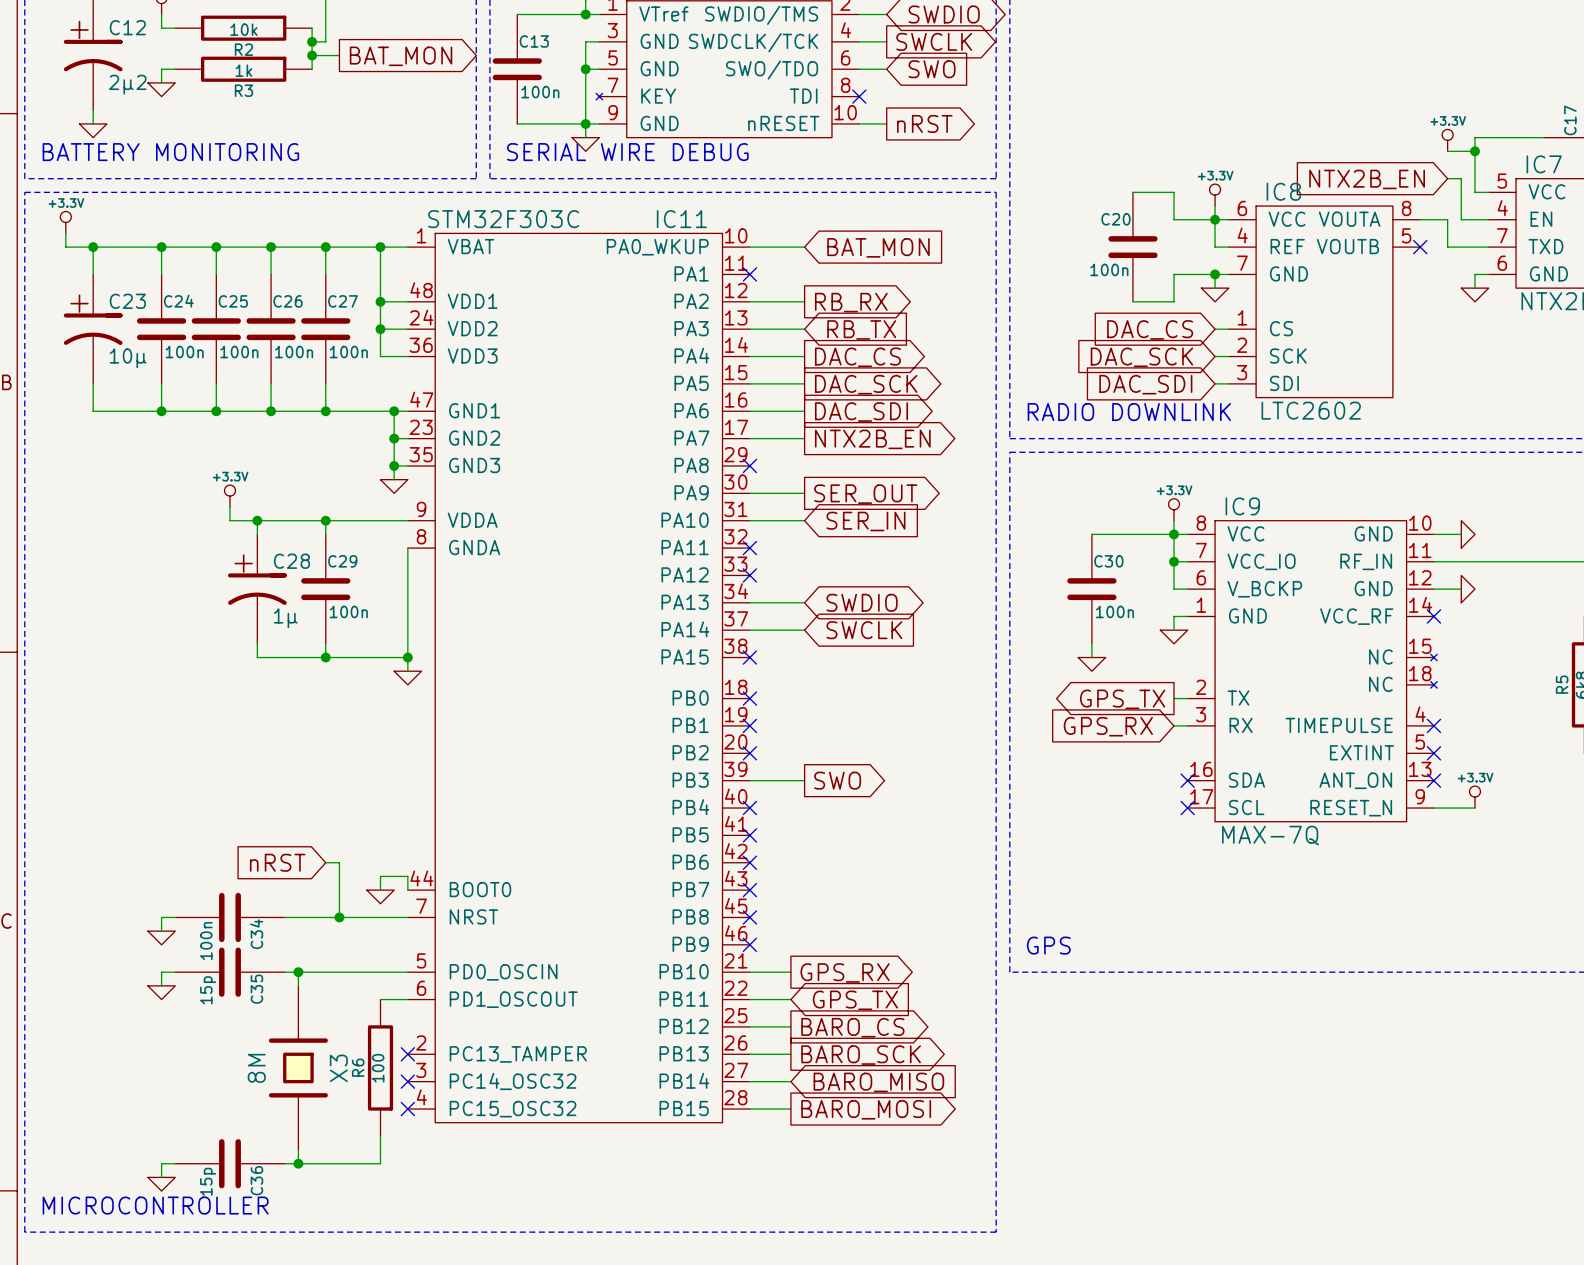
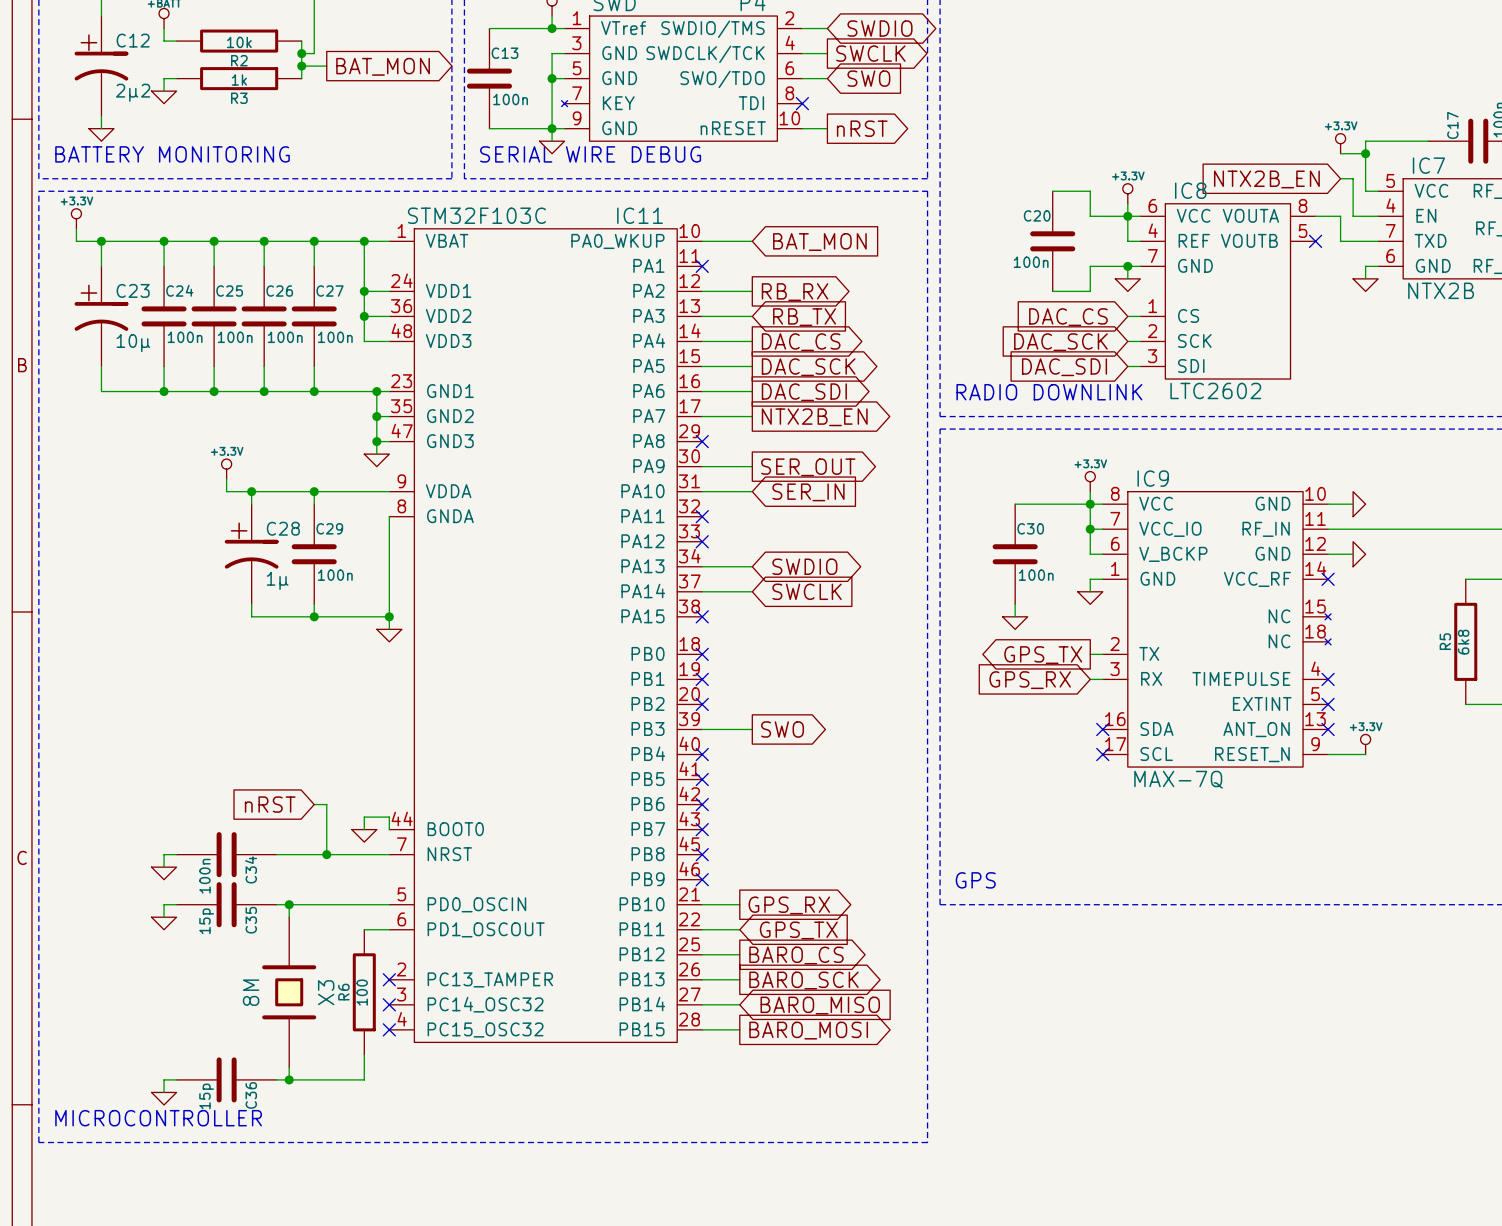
IC11 value: STM32F303C (503, 219) -> STM32F103C (476, 215)
IC11 pin number: 48 (421, 290) -> 24 (401, 280)
IC11 pin number: 24 (421, 317) -> 36 (401, 306)
IC11 pin number: 36 (421, 345) -> 48 (401, 330)
IC11 pin number: 47 (421, 399) -> 23 (401, 381)
IC11 pin number: 23 (421, 427) -> 35 (401, 406)
IC11 pin number: 35 (421, 454) -> 47 (402, 430)

